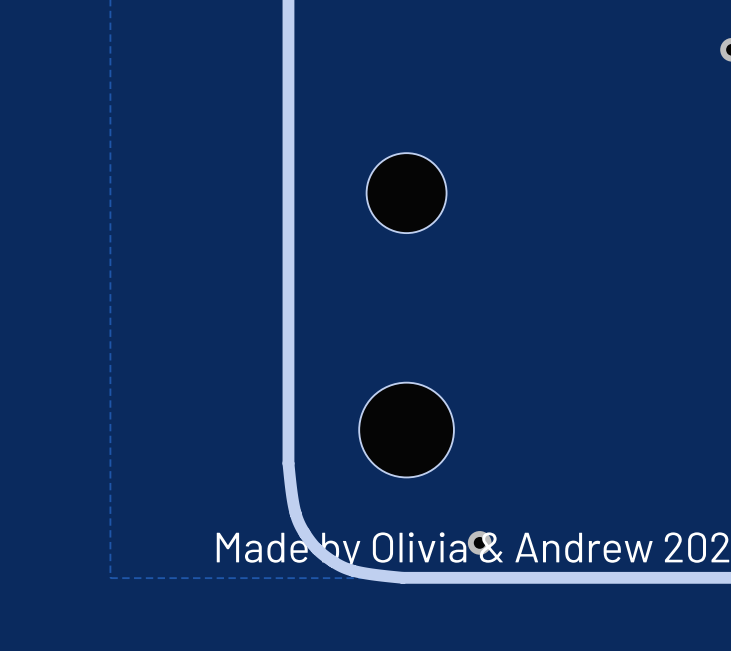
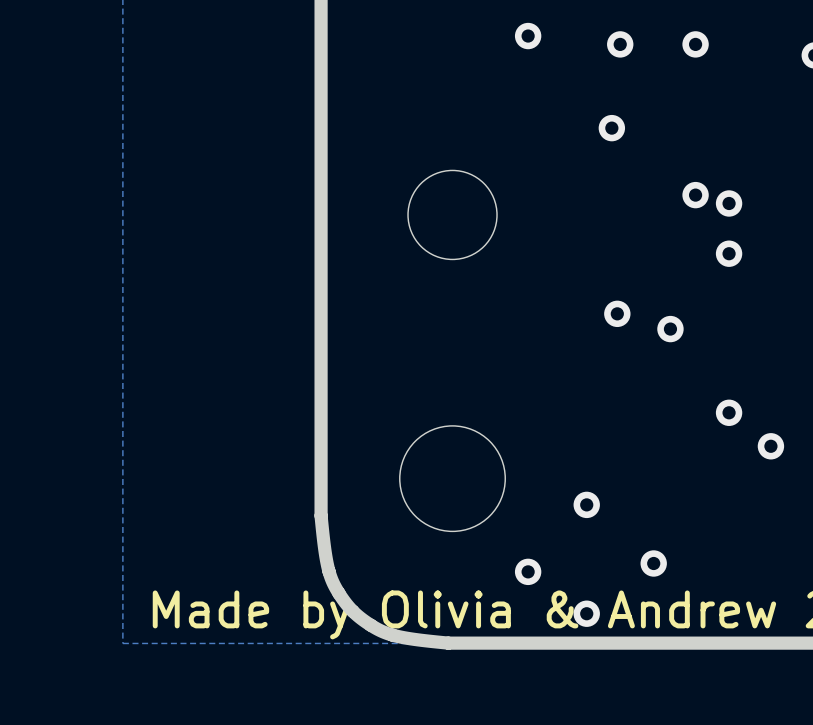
via: none -> (528, 36)
via: none -> (620, 44)
via: none -> (695, 44)
via: none -> (611, 128)
via: none -> (695, 195)
via: none -> (729, 203)
via: none -> (729, 253)
via: none -> (617, 313)
via: none -> (670, 329)
via: none -> (729, 412)
via: none -> (770, 446)
via: none -> (586, 504)
via: none -> (653, 563)
via: none -> (528, 571)
via: (479, 542) -> none
via: none -> (586, 613)

